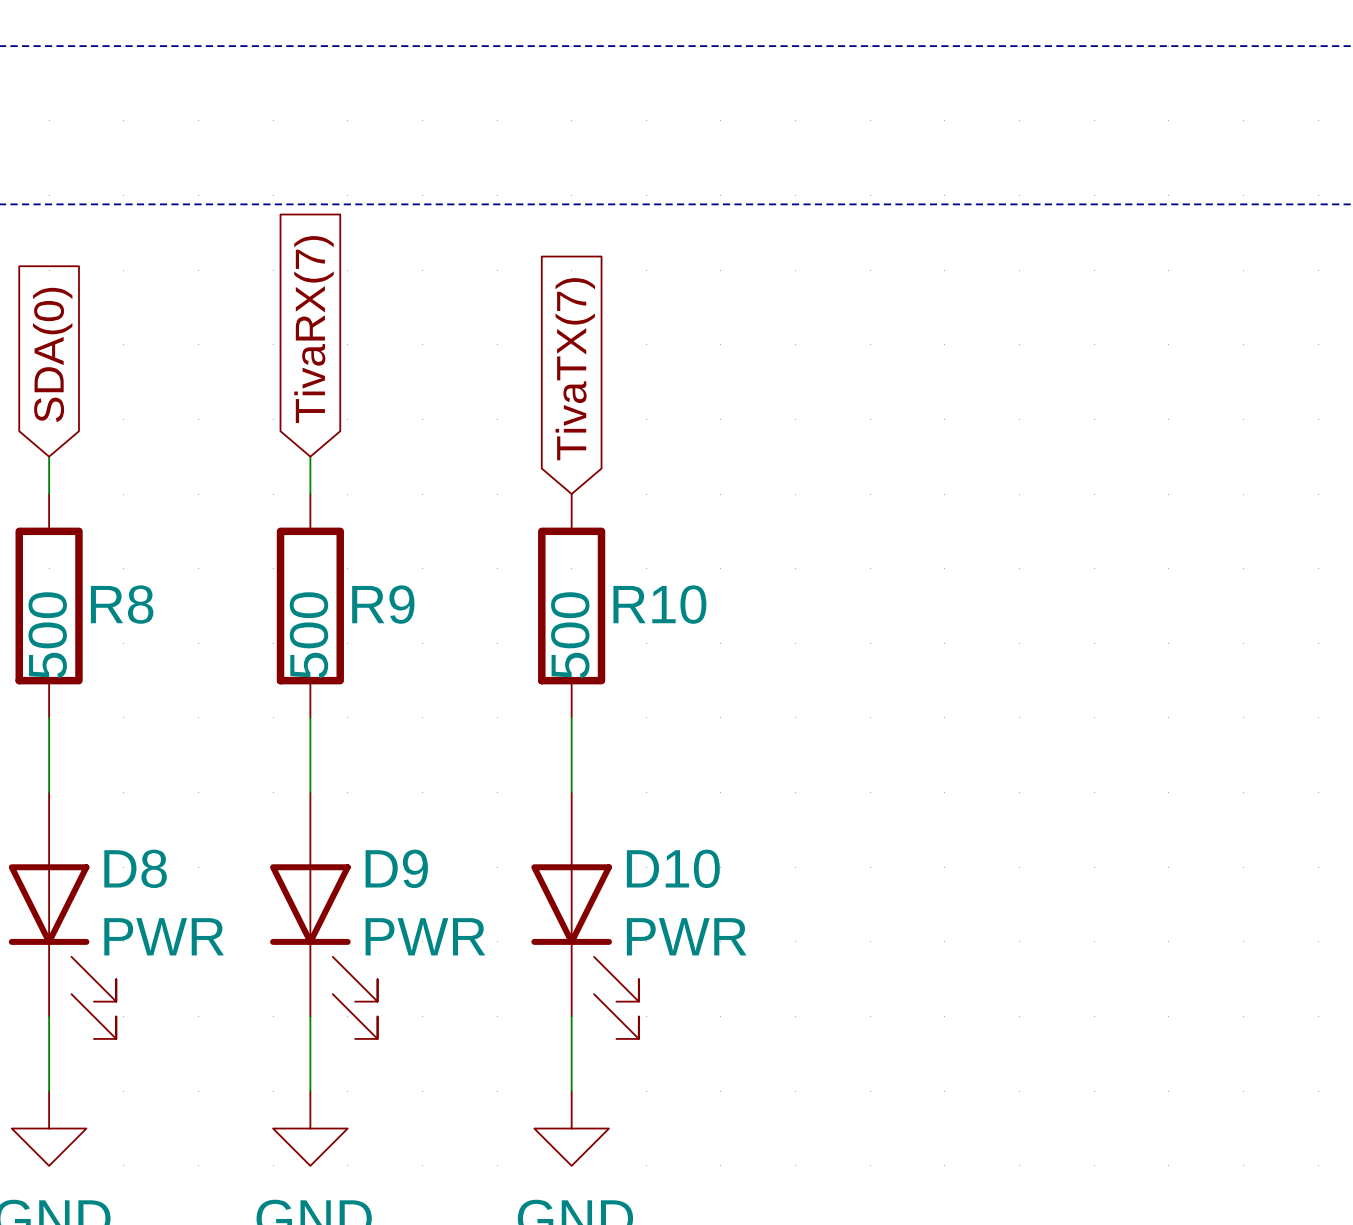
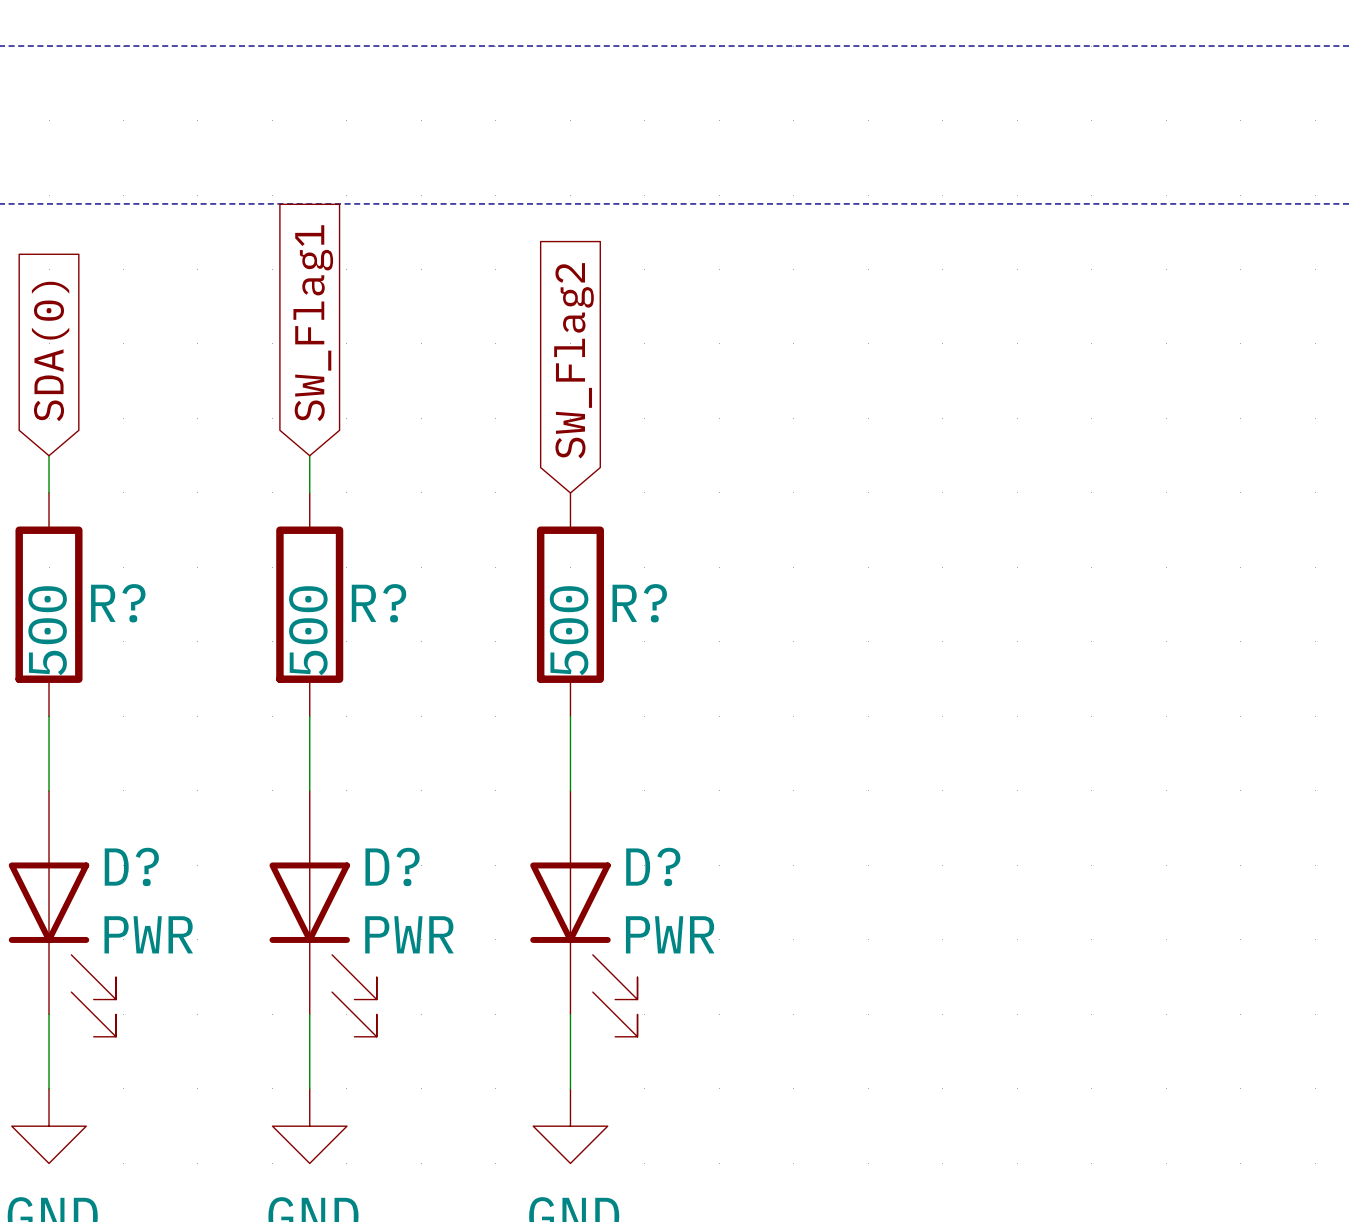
global label: TivaRX(7) (313, 329) -> SW_Flag1 (313, 323)
global label: TivaTX(7) (575, 369) -> SW_Flag2 (574, 360)
R8 name: R8 (122, 604) -> R? (118, 603)
R9 name: R9 (383, 604) -> R? (379, 603)
R10 name: R10 (659, 604) -> R? (639, 603)
D8 name: D8 (135, 868) -> D? (131, 866)
D9 name: D9 (396, 868) -> D? (392, 866)
D10 name: D10 (673, 868) -> D? (653, 866)

